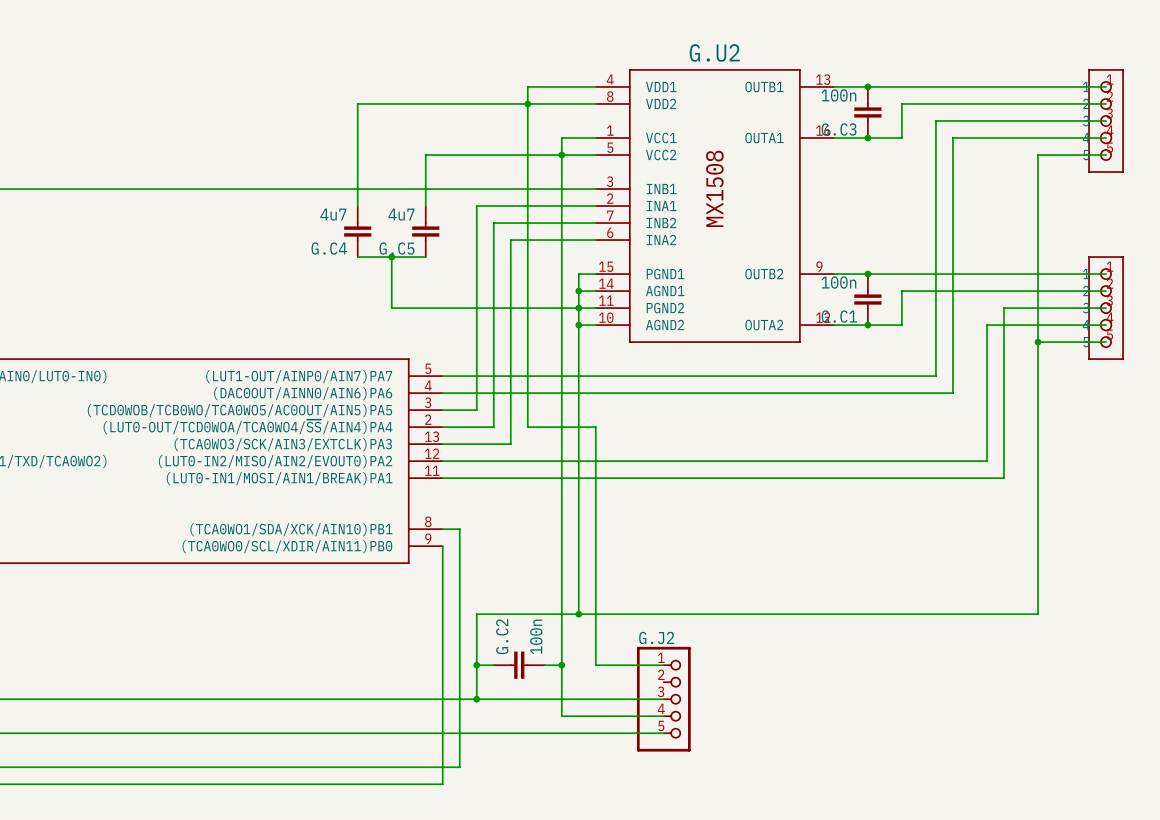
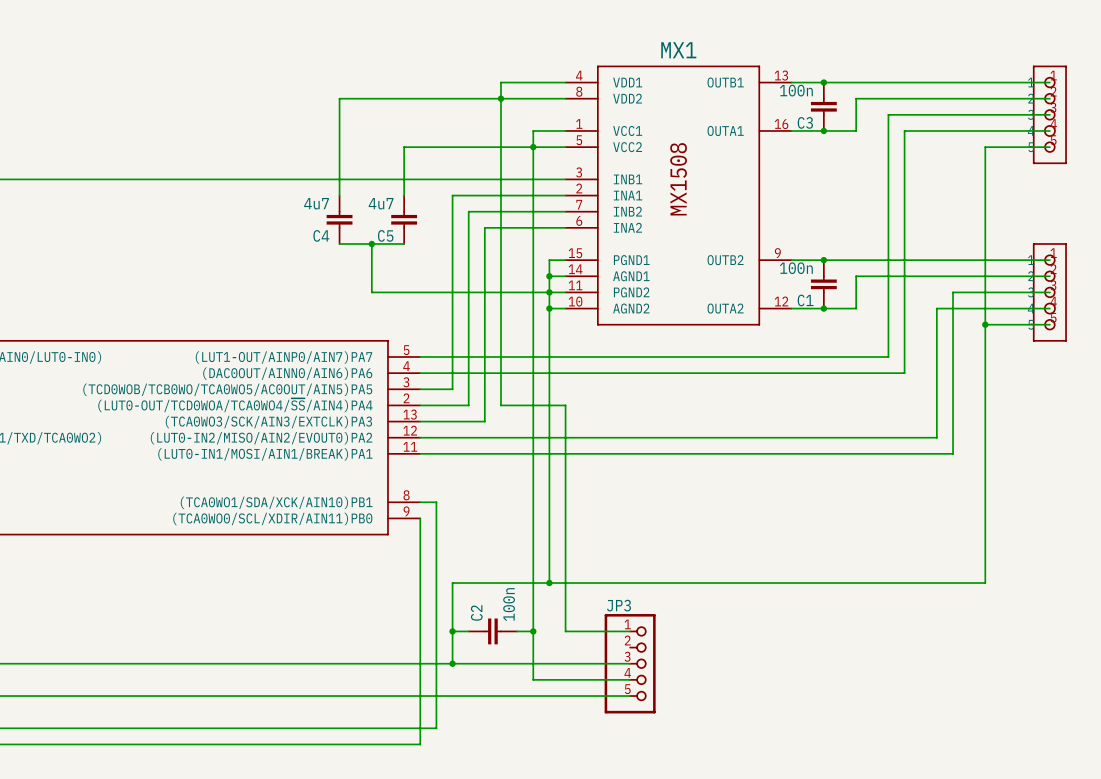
G.U2 name: G.U2 (714, 52) -> MX1 (678, 50)
G.C3 name: G.C3 (839, 129) -> C3 (805, 122)
G.C4 name: G.C4 (329, 248) -> C4 (321, 235)
G.C5 name: G.C5 (397, 248) -> C5 (385, 235)
G.C1 name: G.C1 (839, 316) -> C1 (805, 300)
G.C2 name: G.C2 (502, 636) -> C2 (476, 612)
G.J2 name: G.J2 (656, 637) -> JP3 (618, 605)

